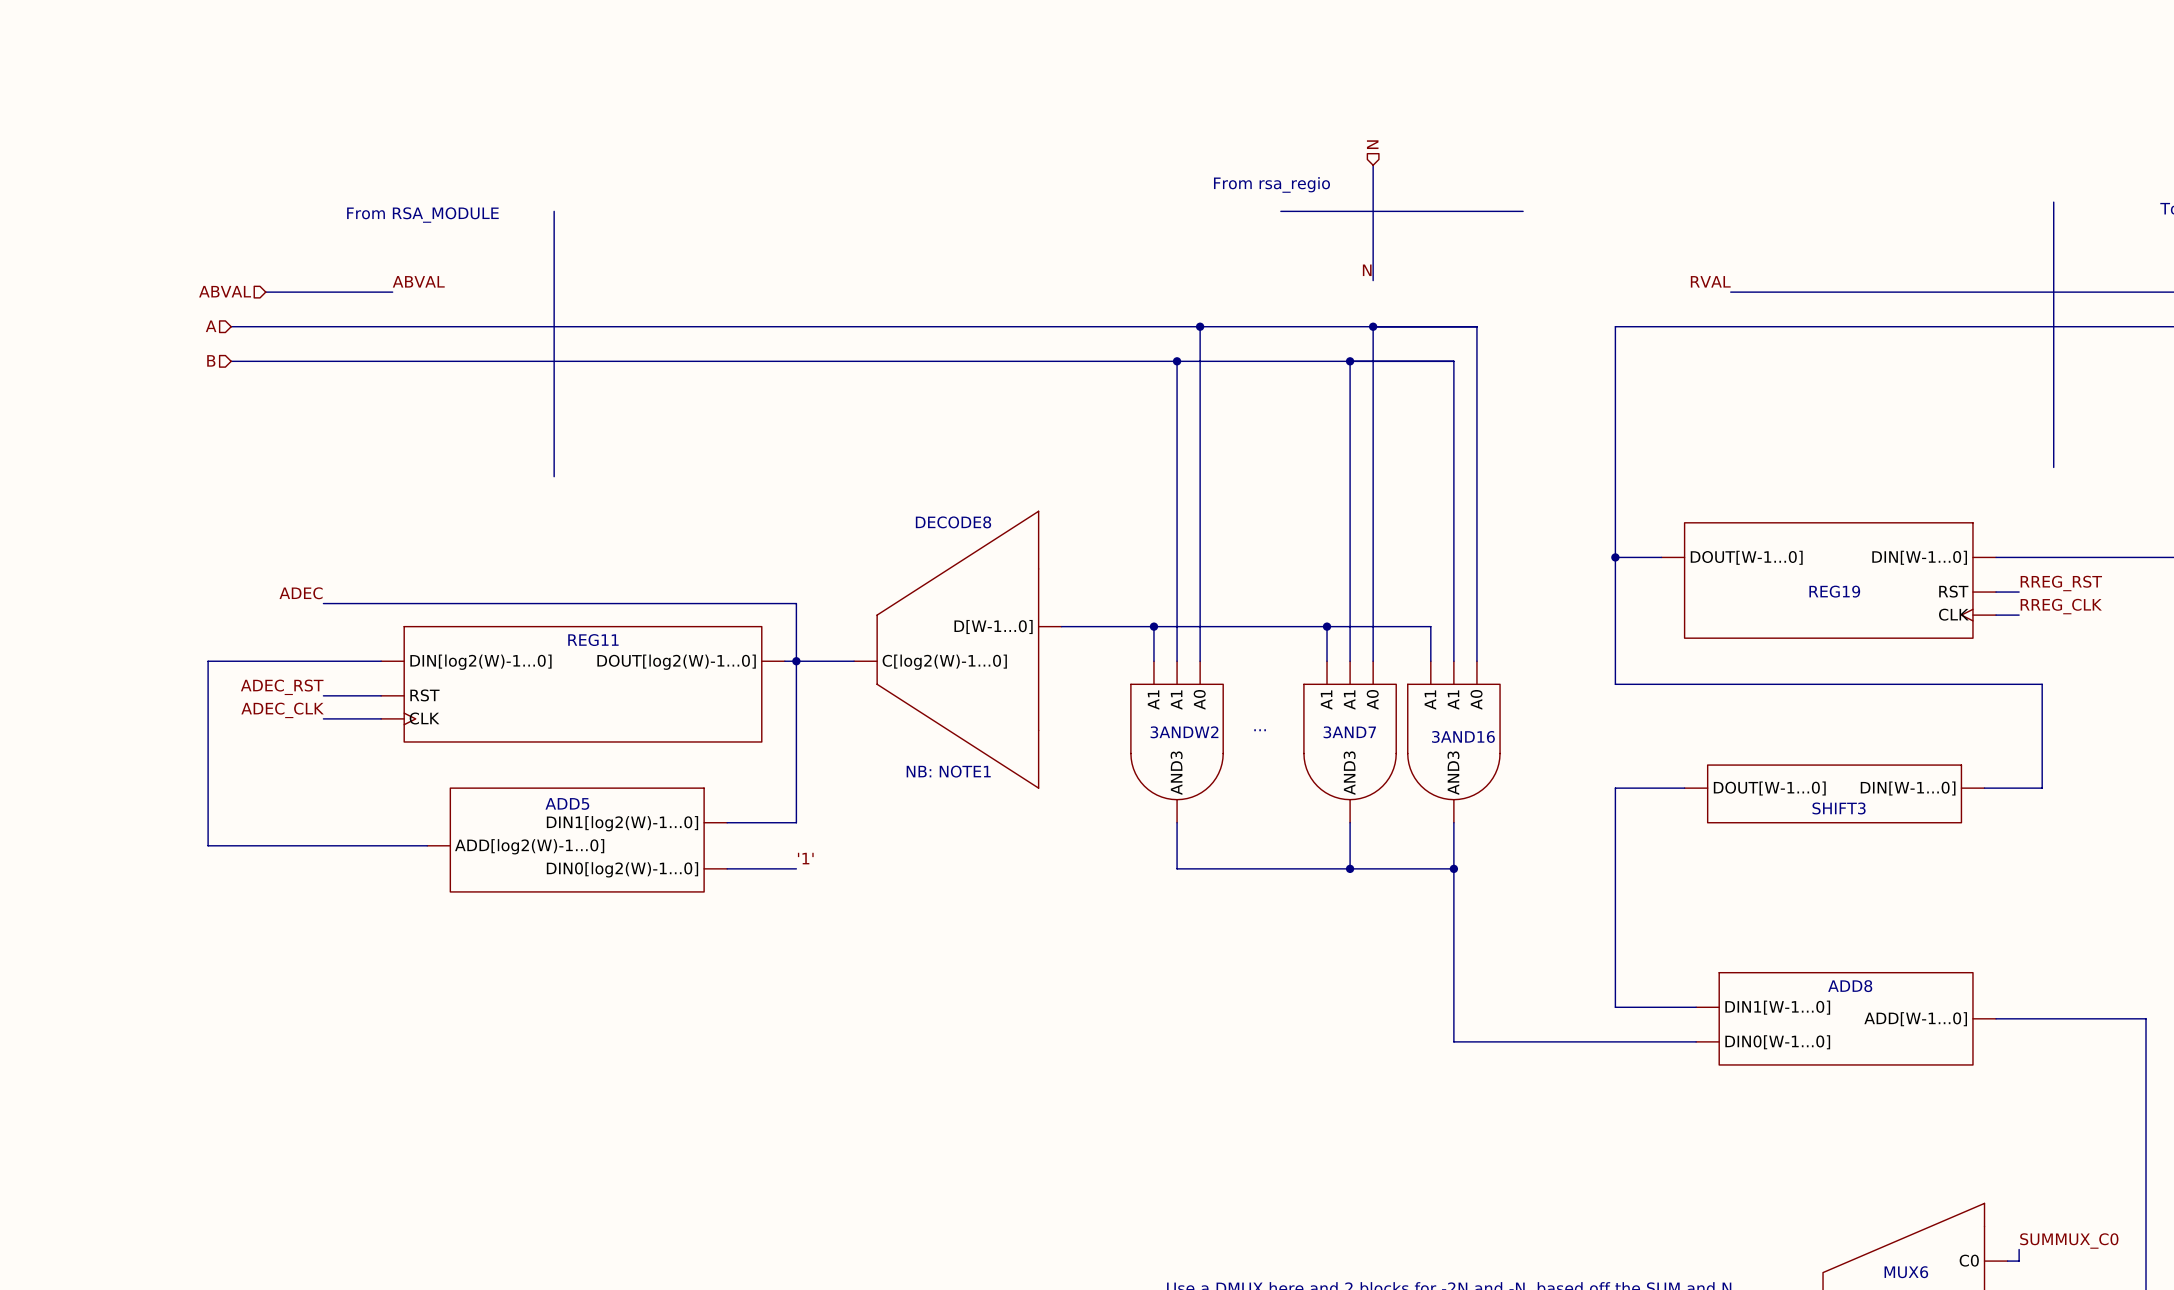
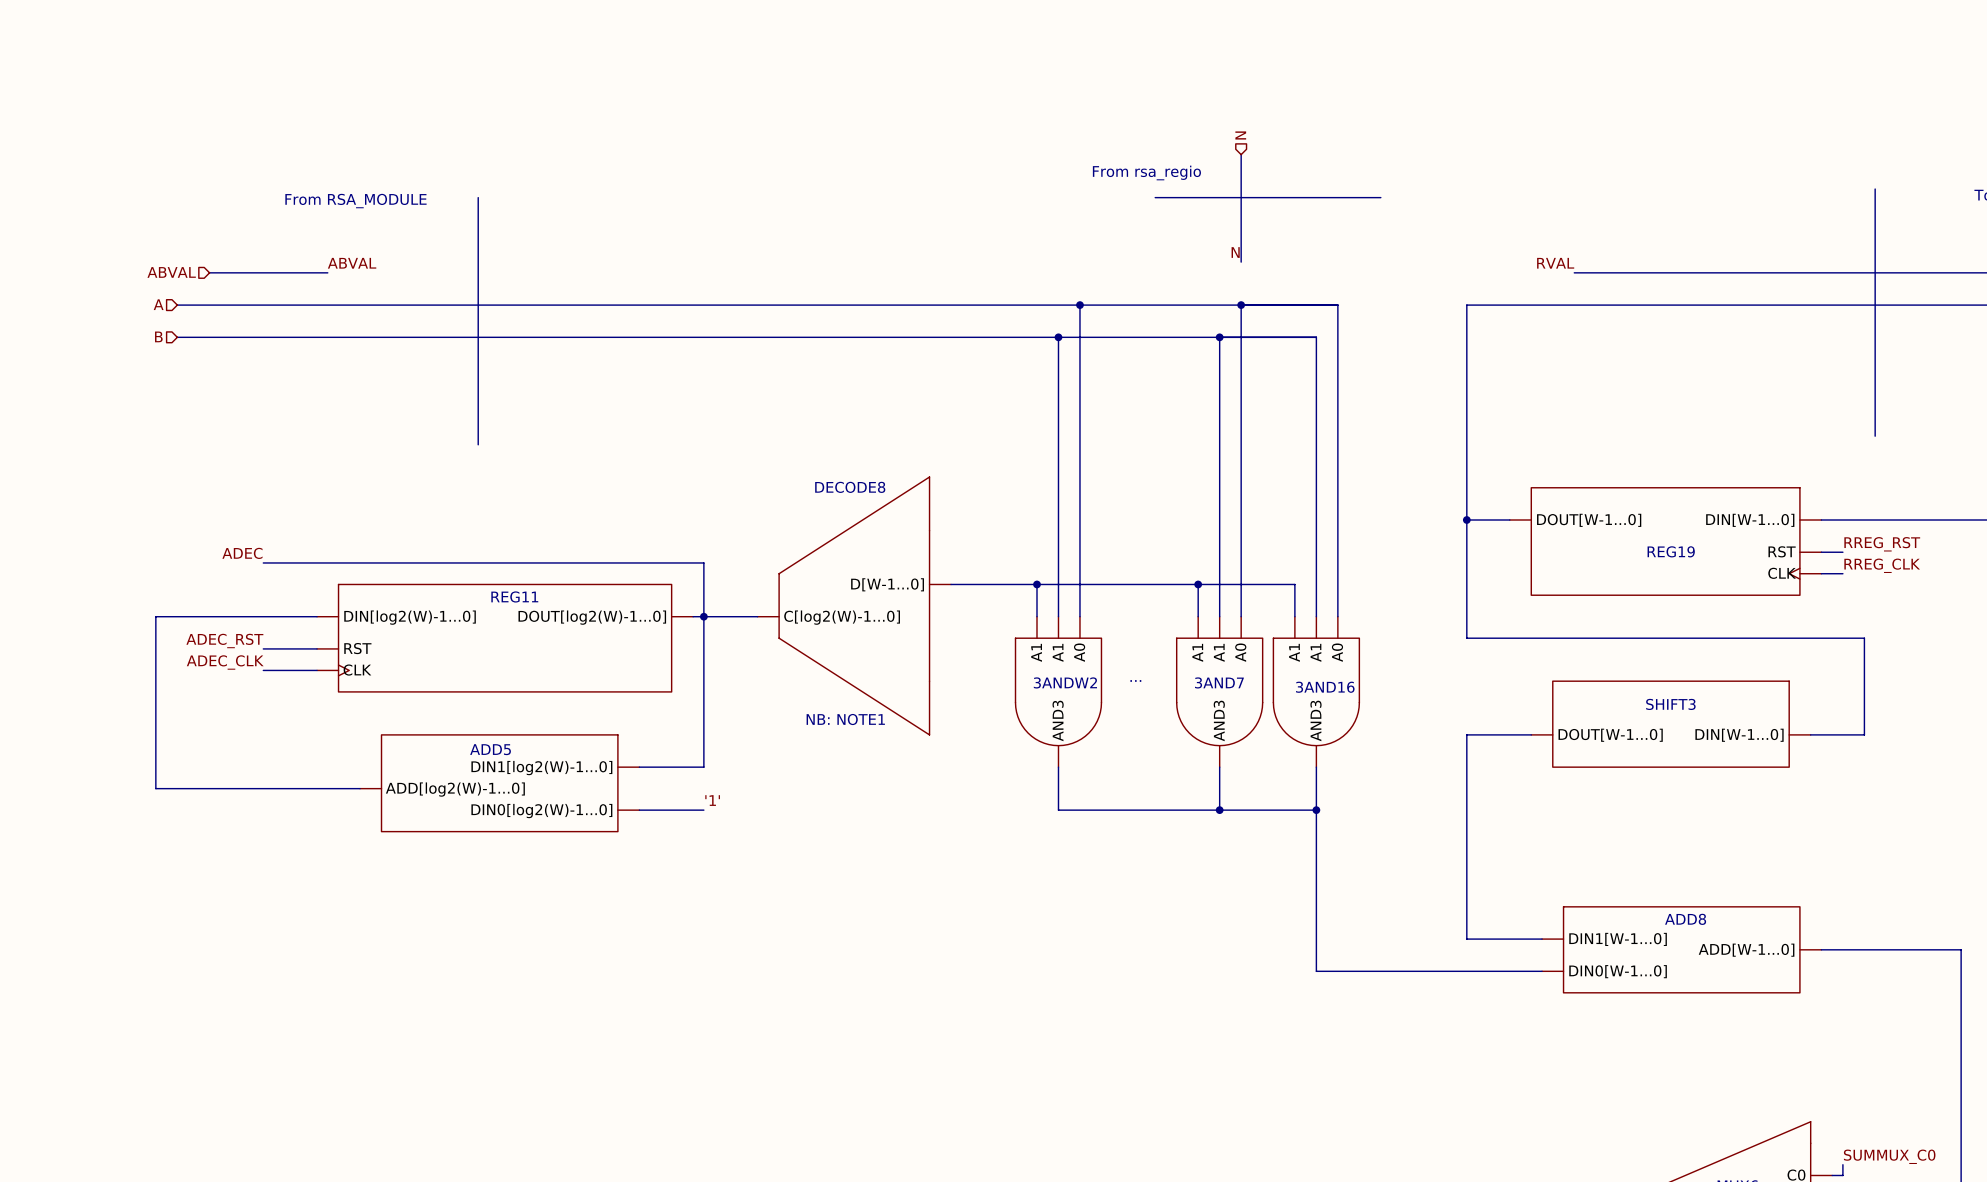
SHIFT3 symbol: [1684, 765, 1985, 823] -> [1531, 681, 1811, 768]
SHIFT3 name position: SHIFT3 (1839, 808) -> SHIFT3 (1670, 704)

